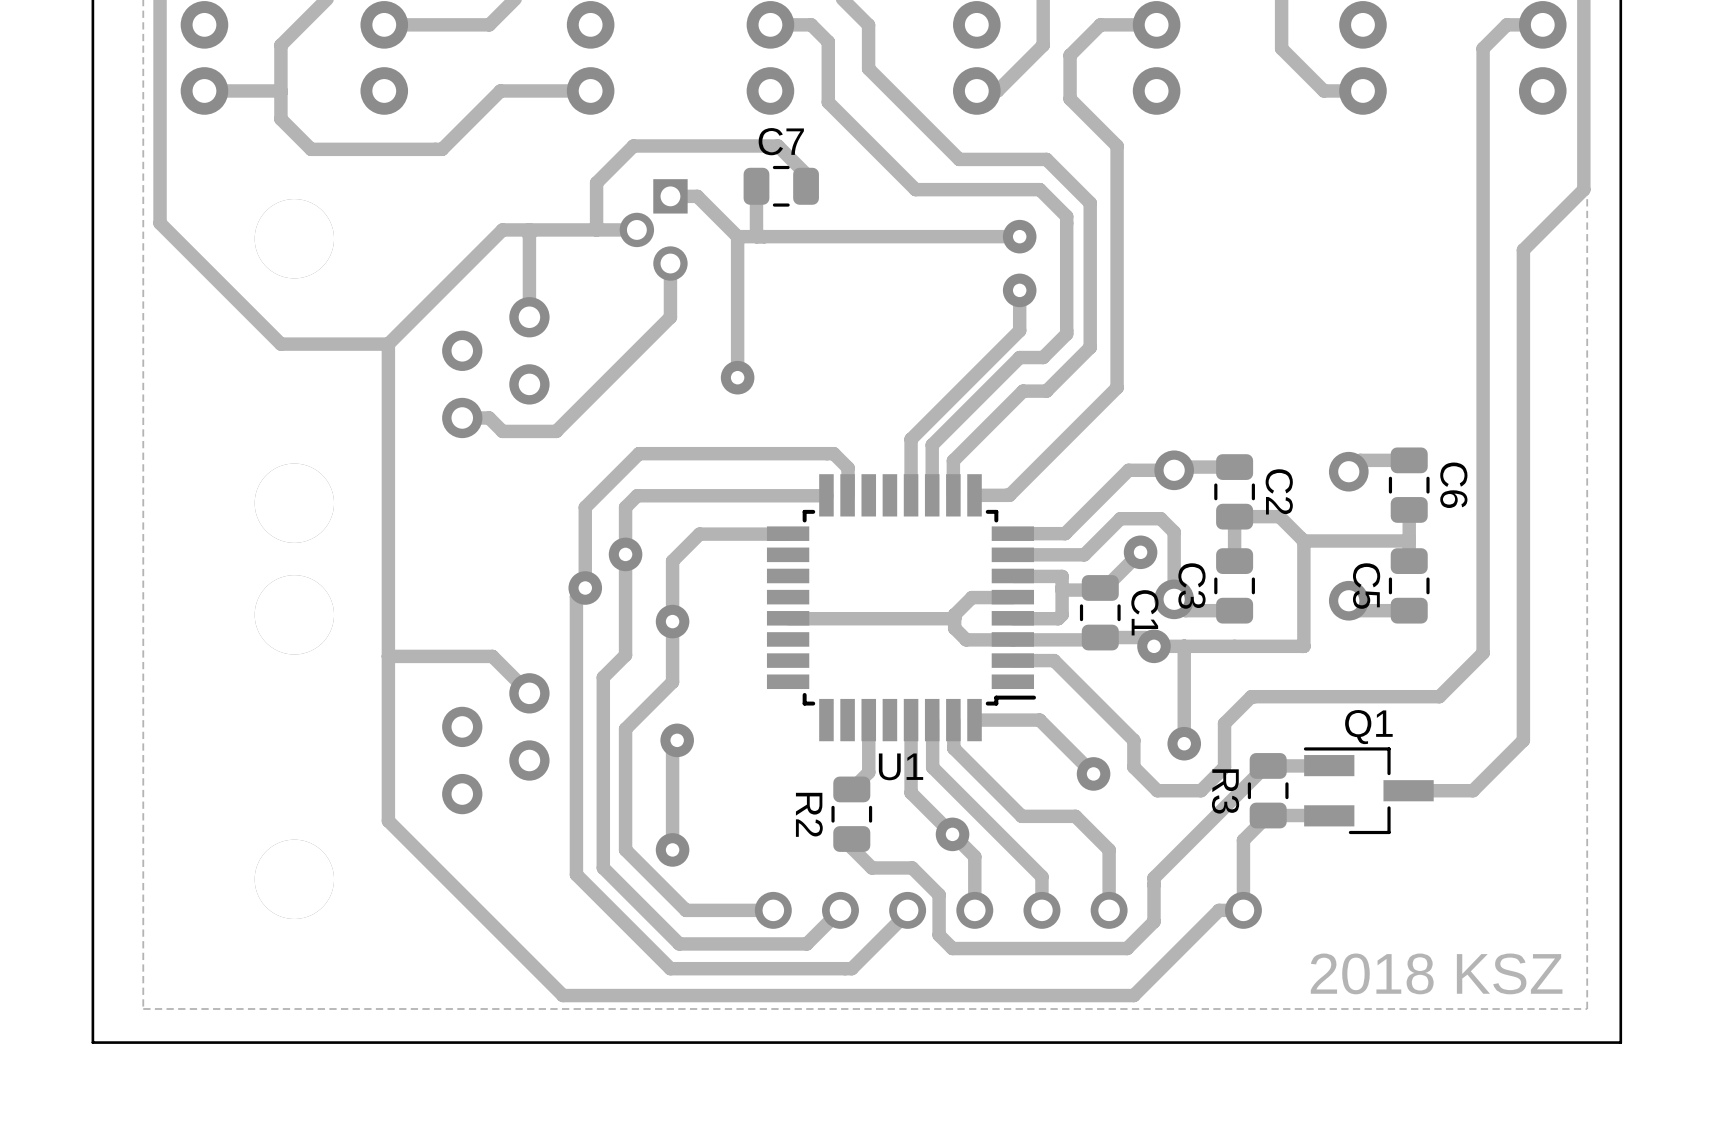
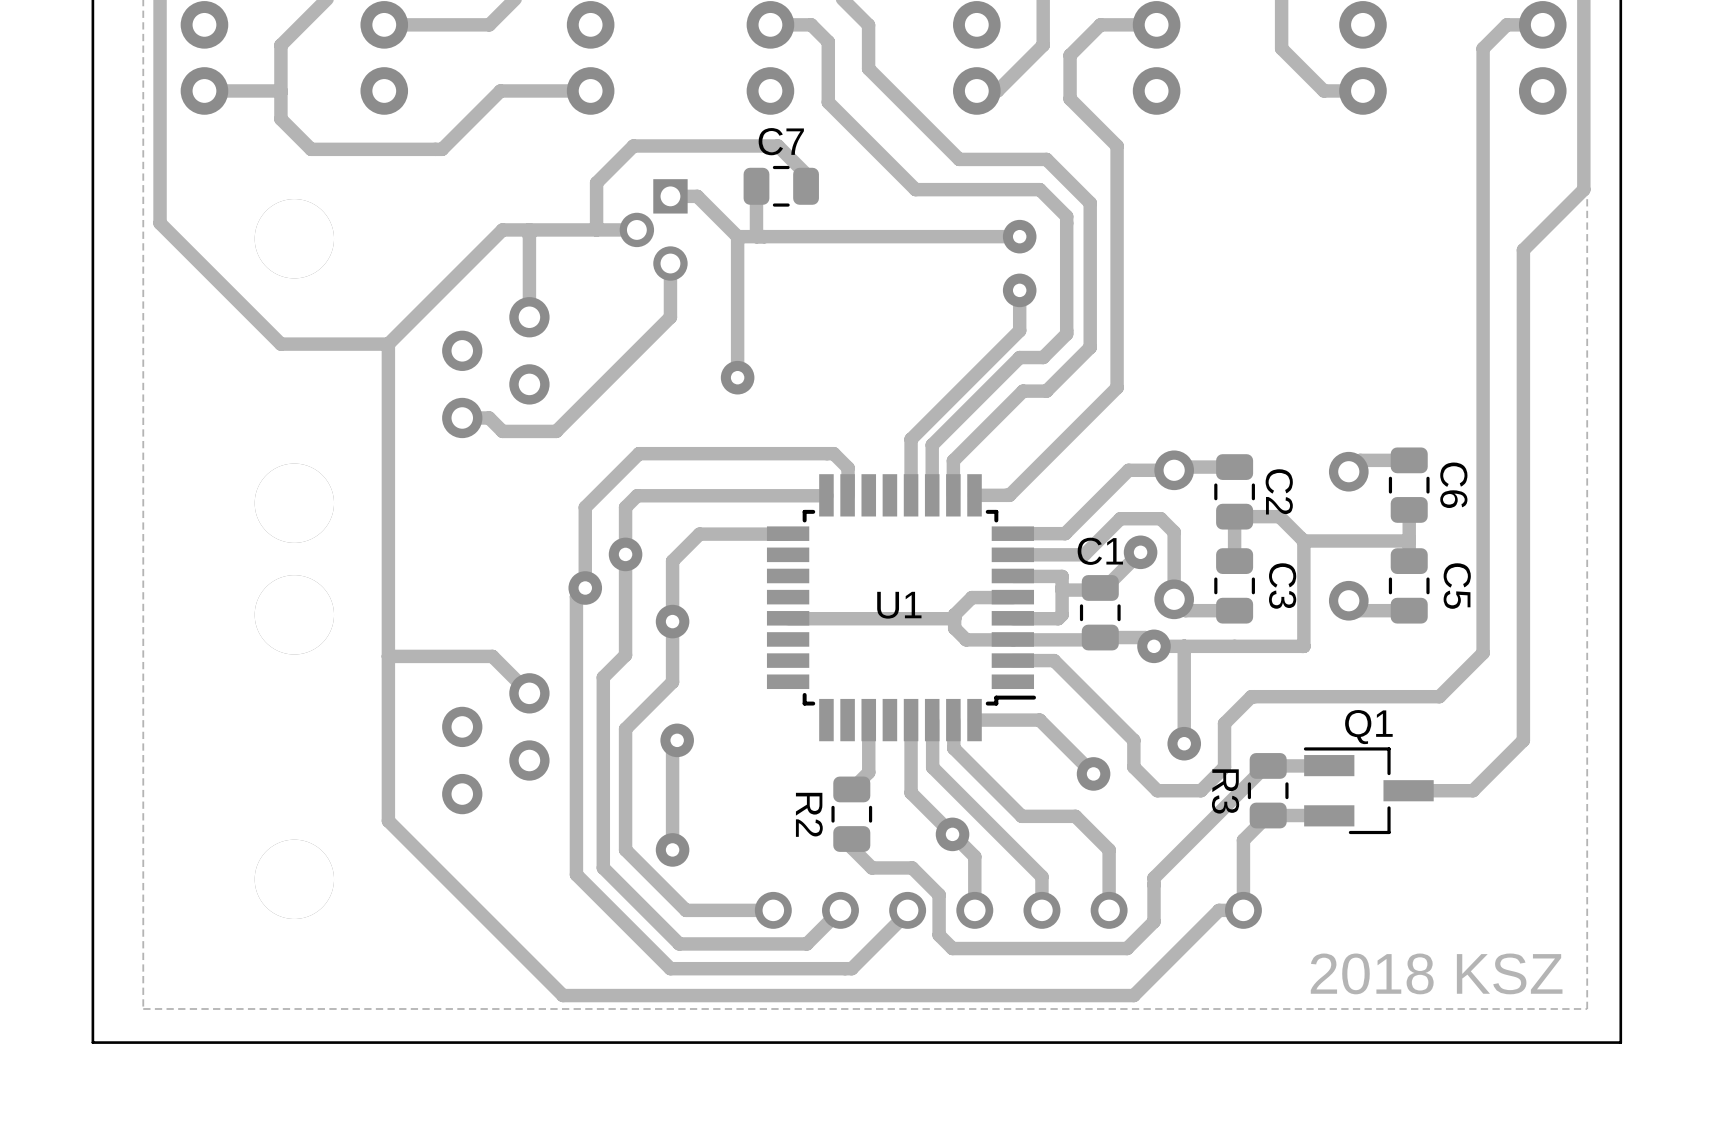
C3 name position: C3 (1191, 586) -> C3 (1282, 586)
C5 name position: C5 (1366, 586) -> C5 (1457, 586)
C1 name rotation: 0° (1144, 612) -> 90° counterclockwise (1100, 551)
C1 name position: C1 (1144, 612) -> C1 (1100, 551)
U1 name position: U1 (901, 766) -> U1 (899, 605)

